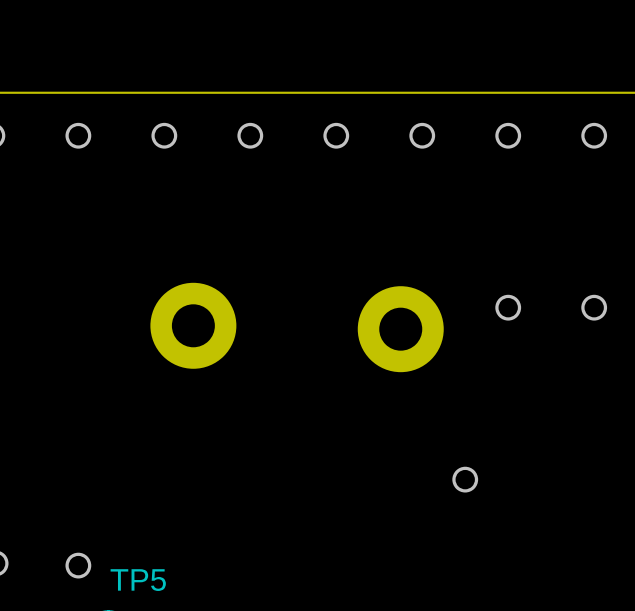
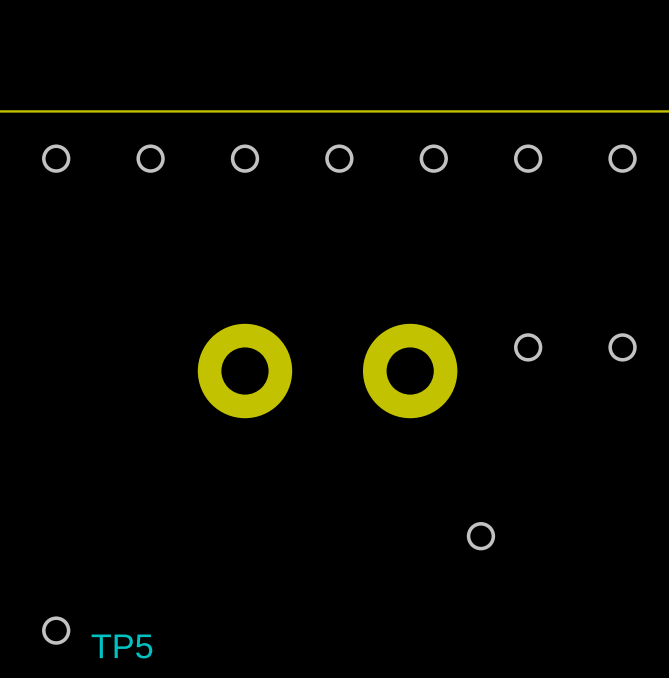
part position: (193, 325) -> (244, 371)

